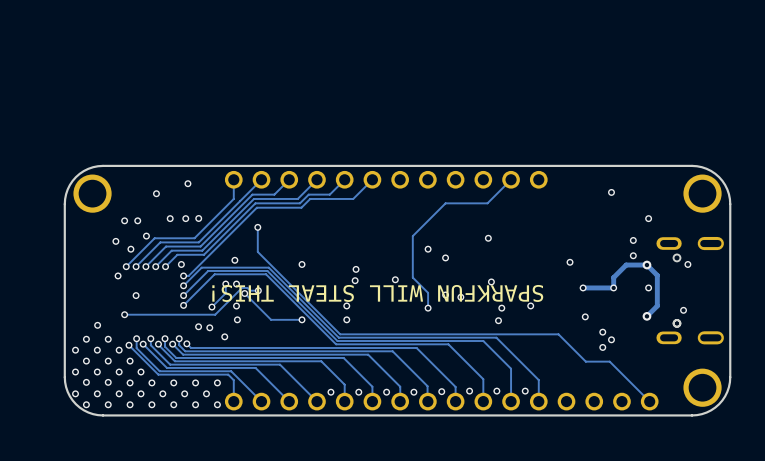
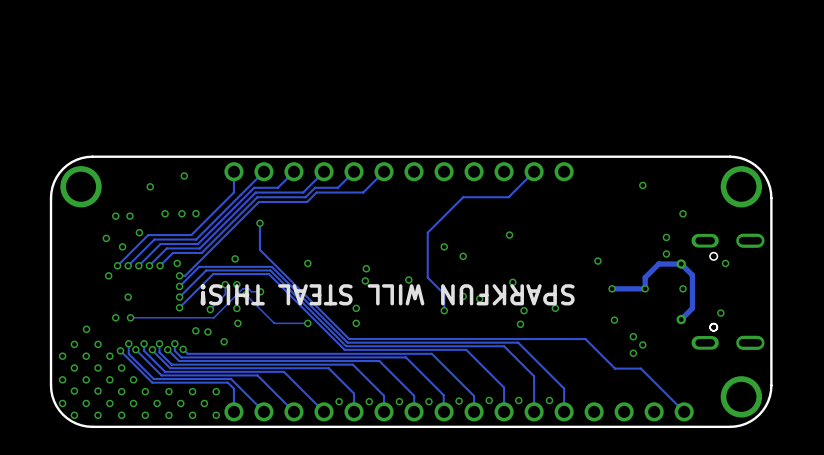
track: (138, 314) (124, 314) -> none
via: none -> (130, 317)

